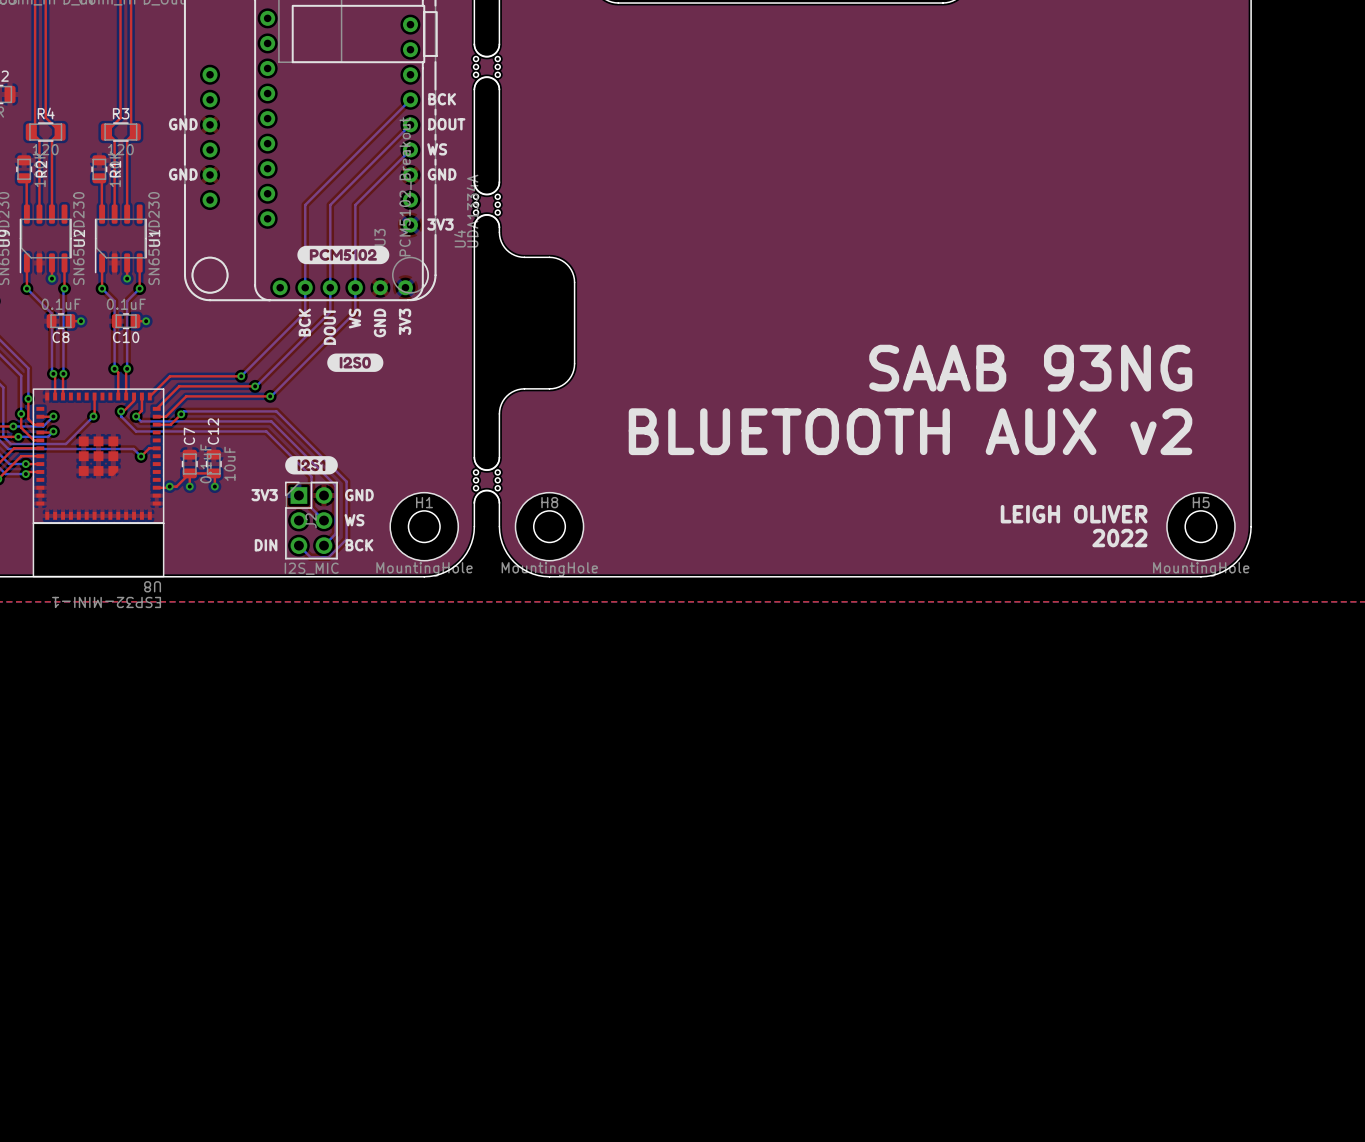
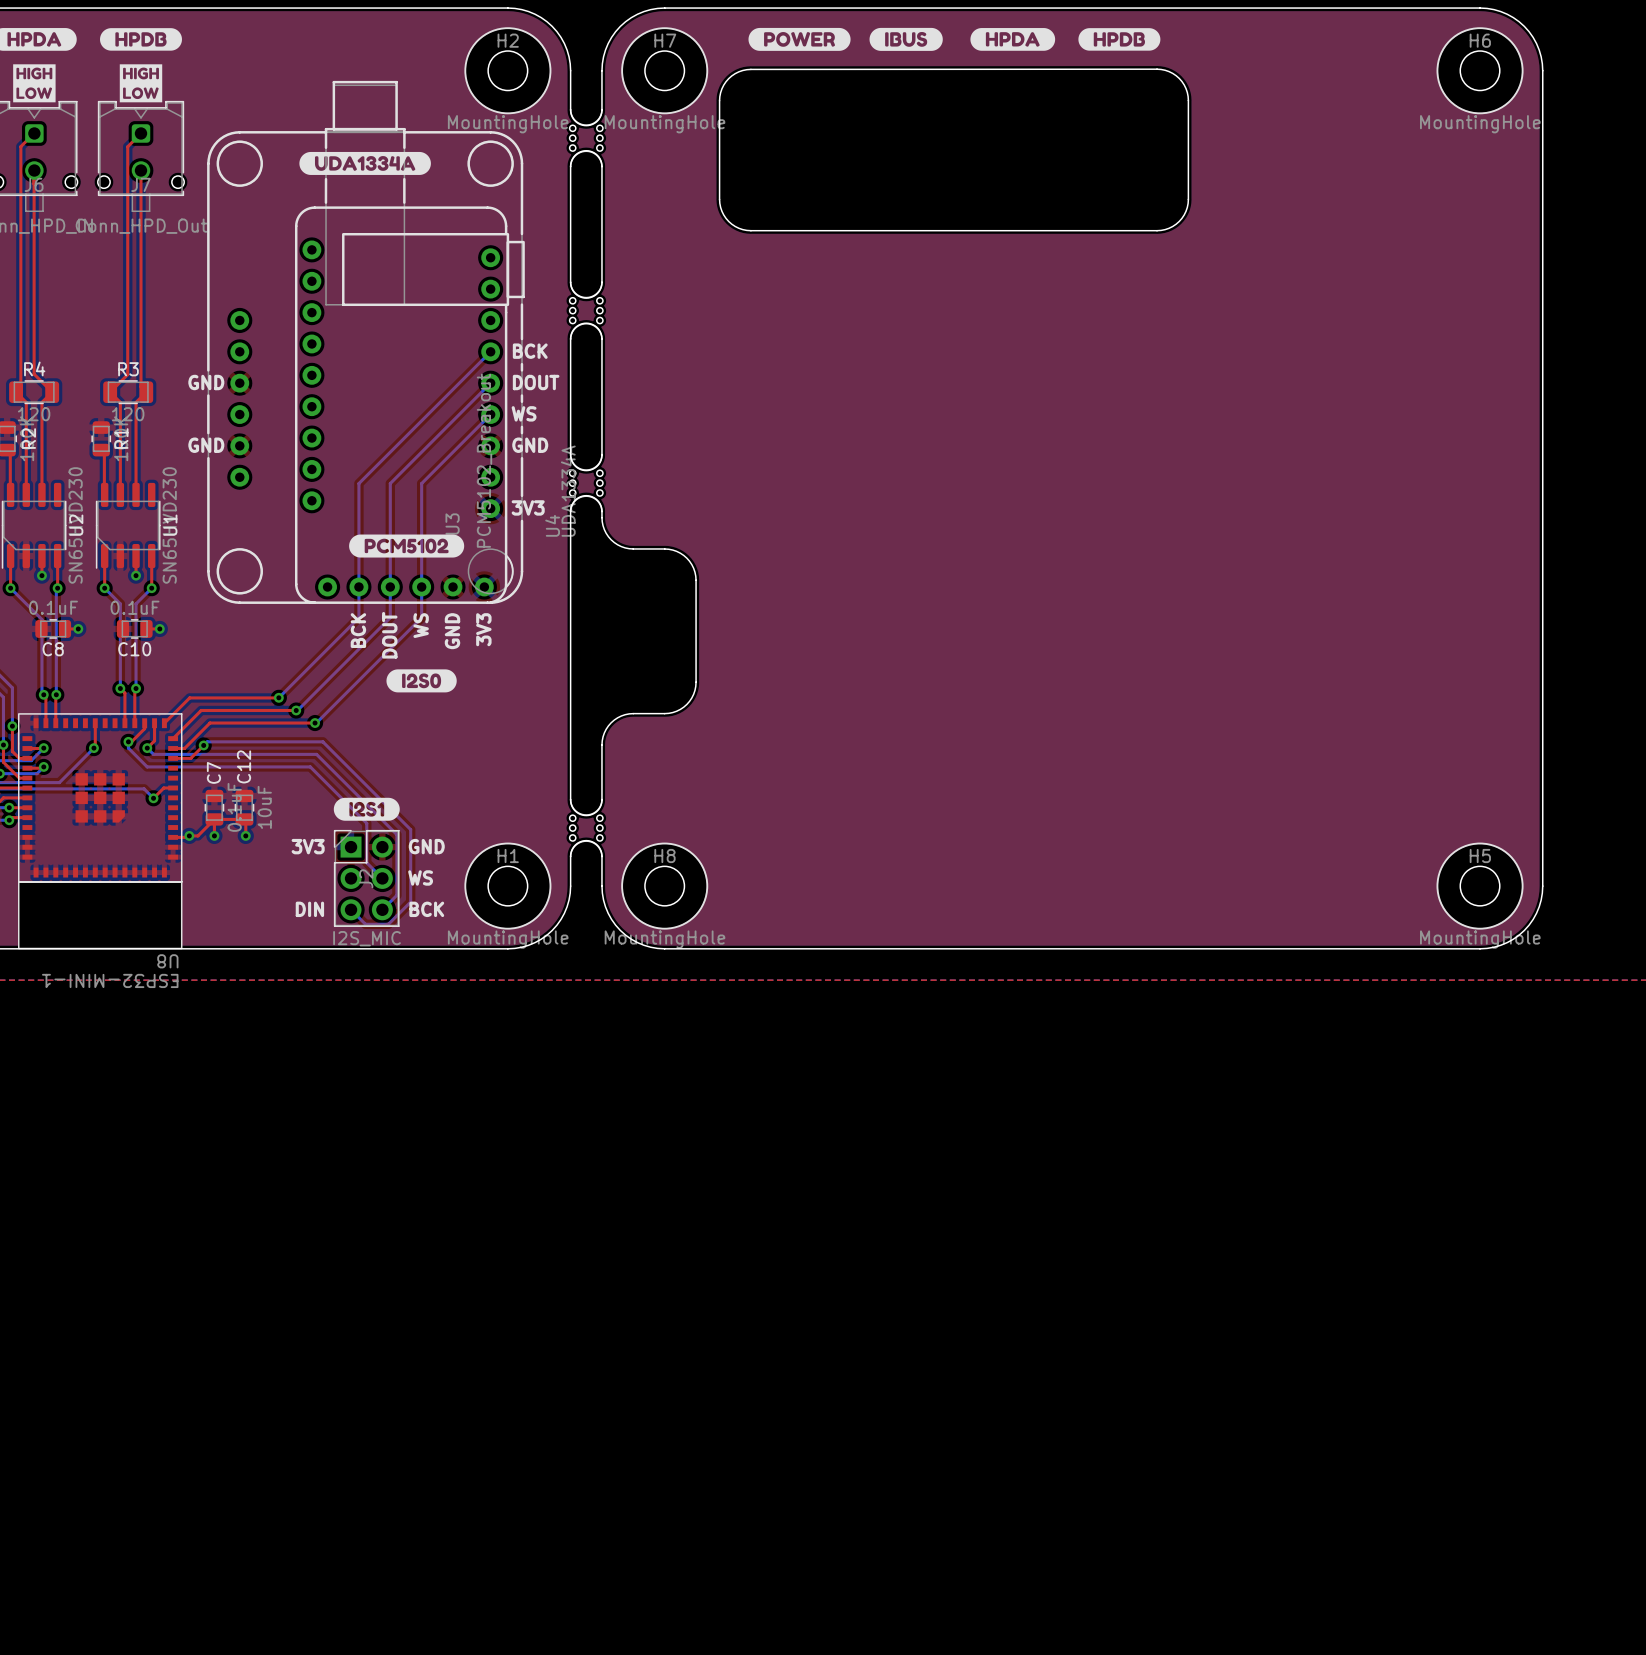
text: SAAB 93NG (1030, 368) -> none
text: BLUETOOTH AUX v2 (910, 431) -> none
text: LEIGH OLIVER (1074, 514) -> none
text: 2022 (1119, 538) -> none

